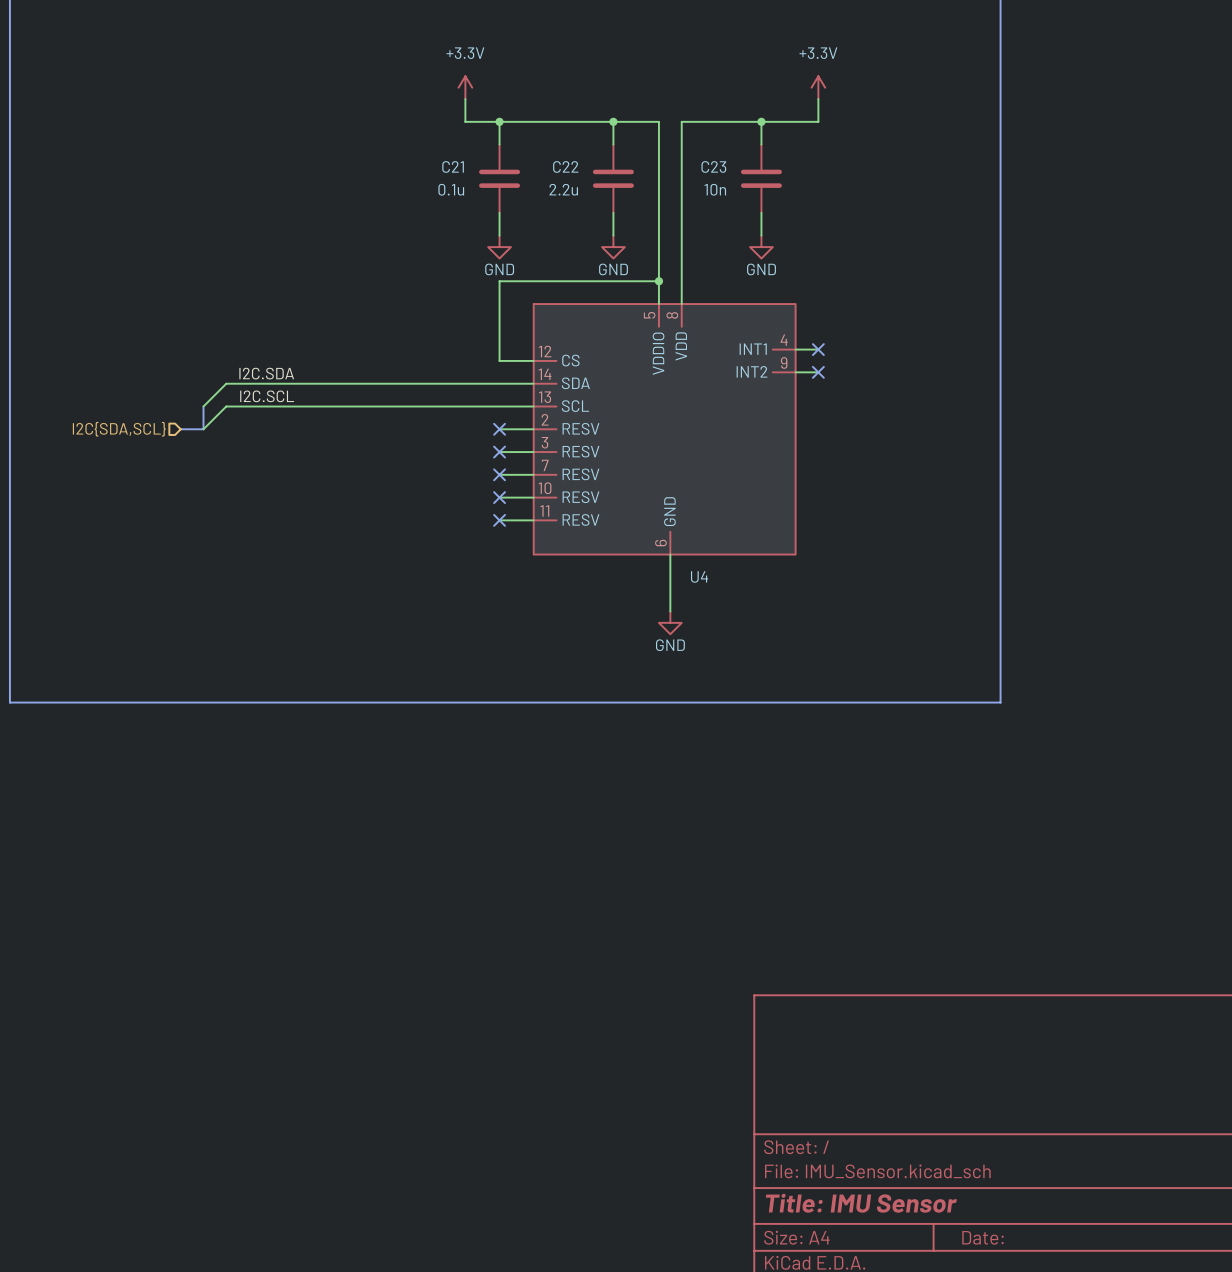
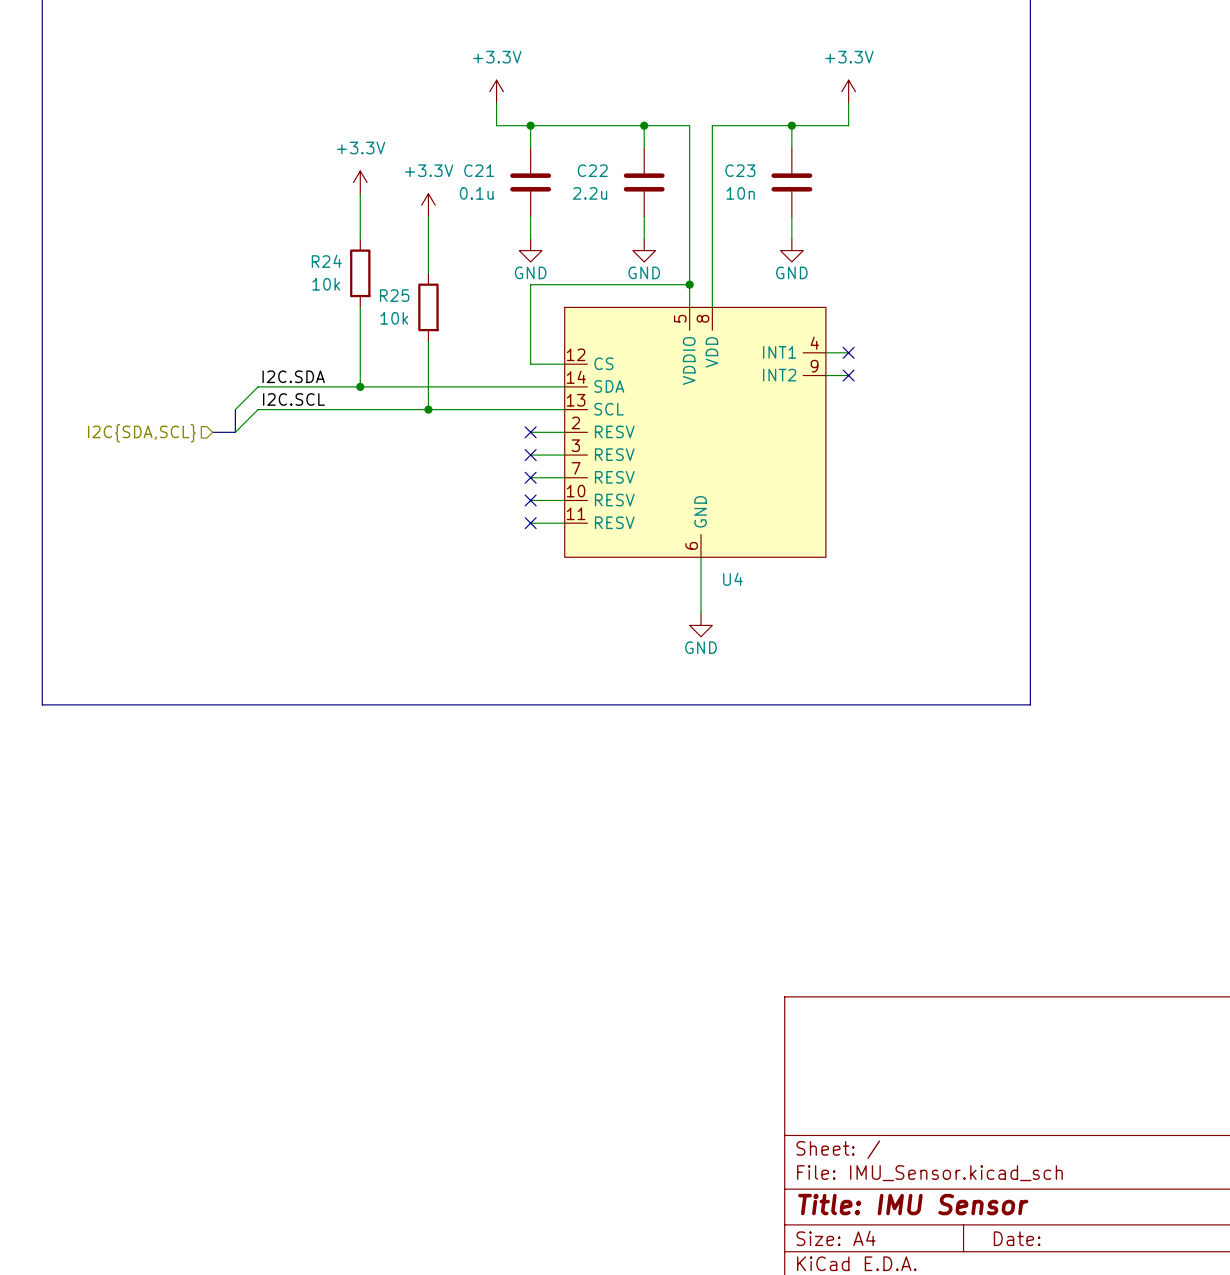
power symbol: none -> +3.3V (360, 182)
wire: none -> (360, 193) (360, 239)
power symbol: none -> +3.3V (428, 205)
wire: none -> (428, 216) (428, 273)
R24: none -> 10k (360, 273)
wire: none -> (360, 307) (360, 386)
R25: none -> 10k (428, 307)
wire: none -> (428, 341) (428, 409)
junction: none -> (360, 386)
junction: none -> (428, 409)

